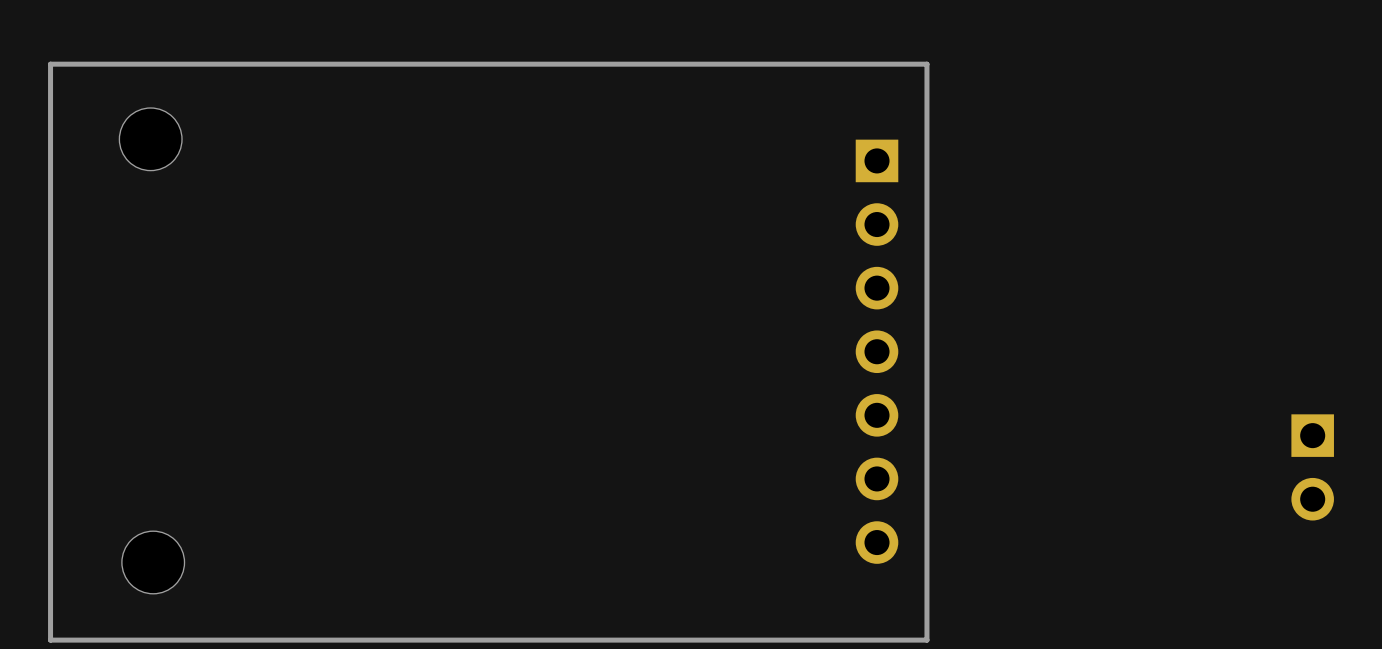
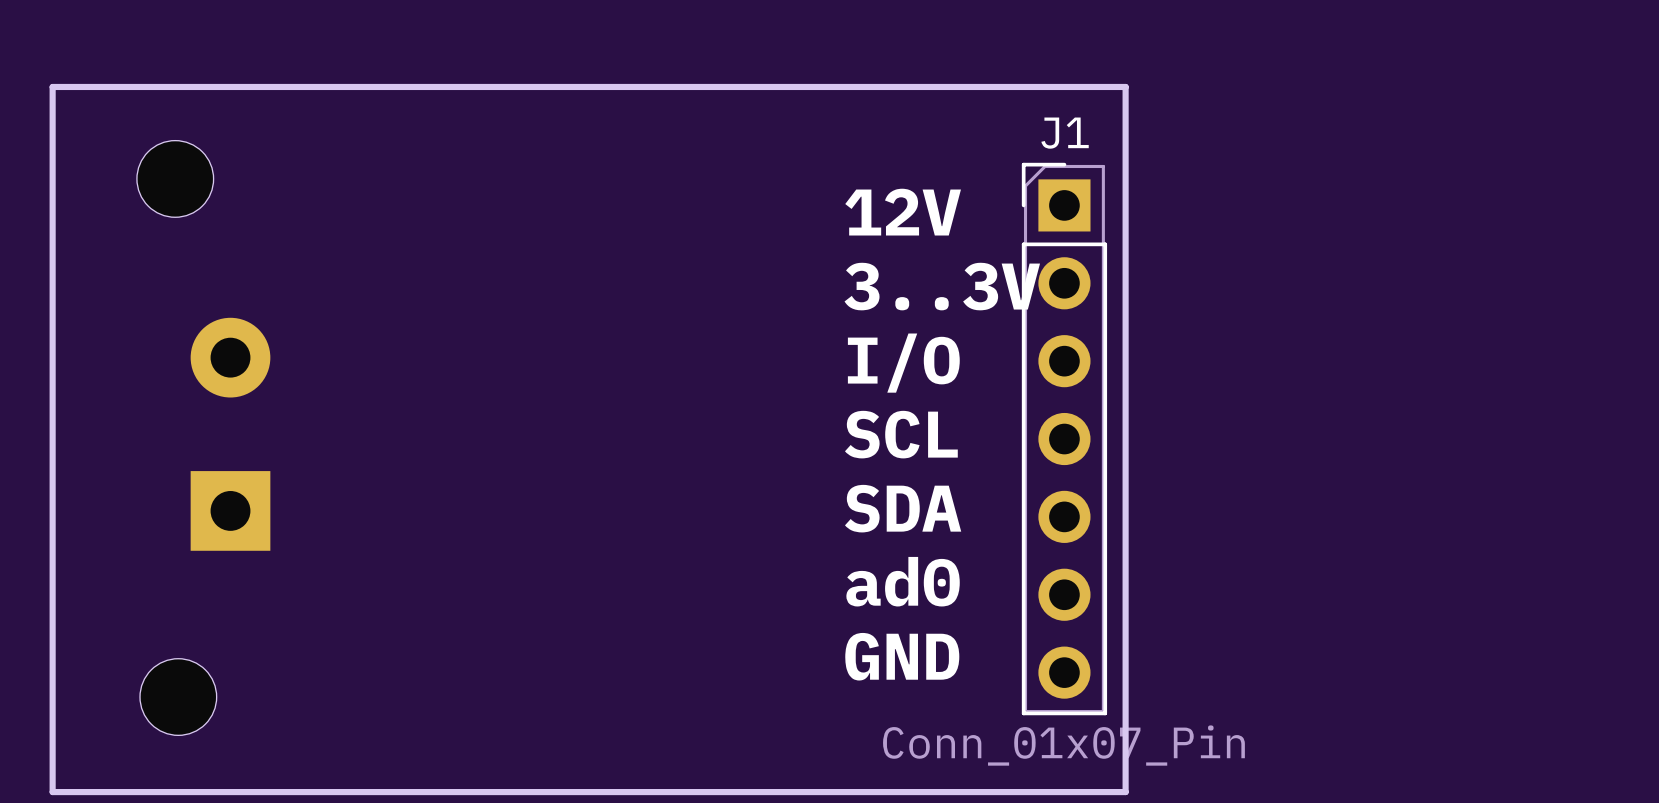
text: none -> 12V (903, 212)
text: none -> 3..3V (942, 286)
text: none -> I/O (903, 363)
part: none -> (230, 434)
text: none -> SCL (901, 434)
J1 side: top (877, 351) -> bottom (1064, 439)
text: none -> SDA (903, 508)
part: (1312, 467) -> none
text: none -> ad0 (903, 581)
text: none -> GND (902, 656)

